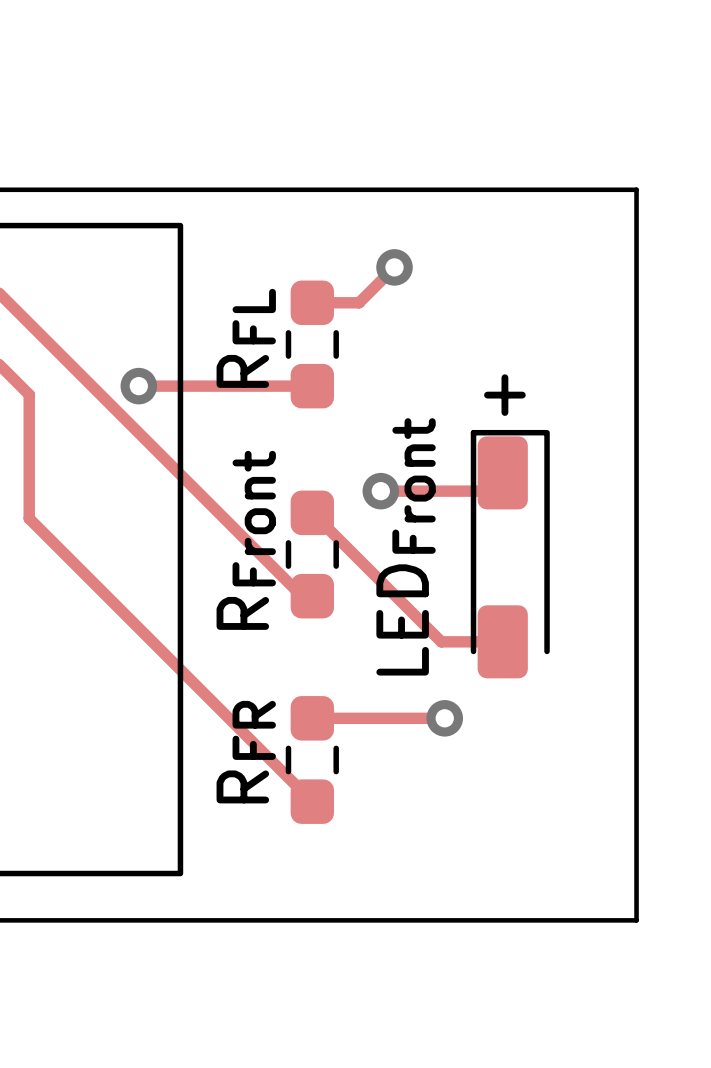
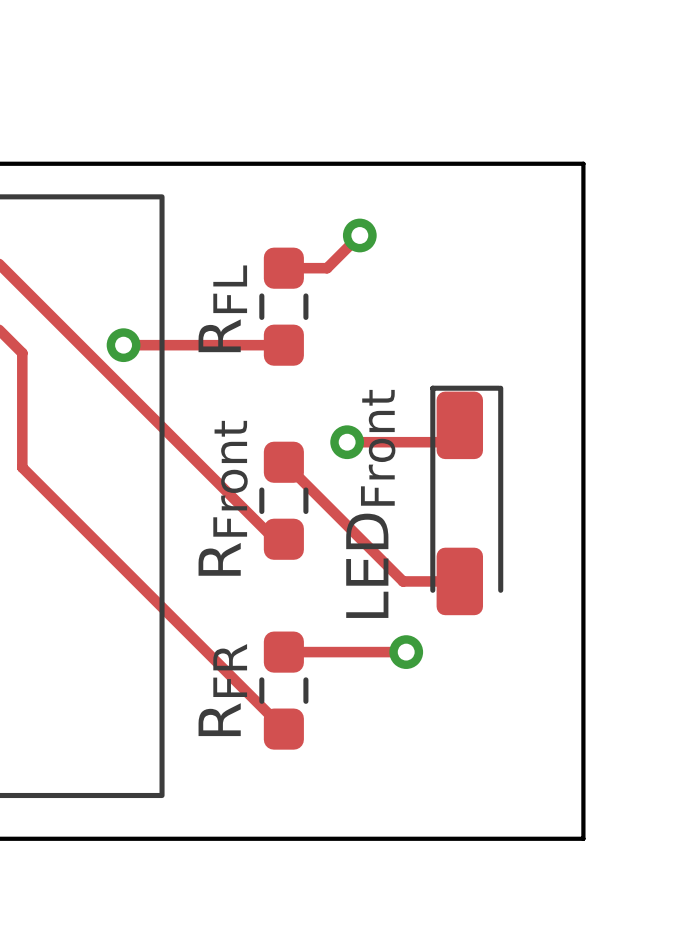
text: + (504, 395) -> none

